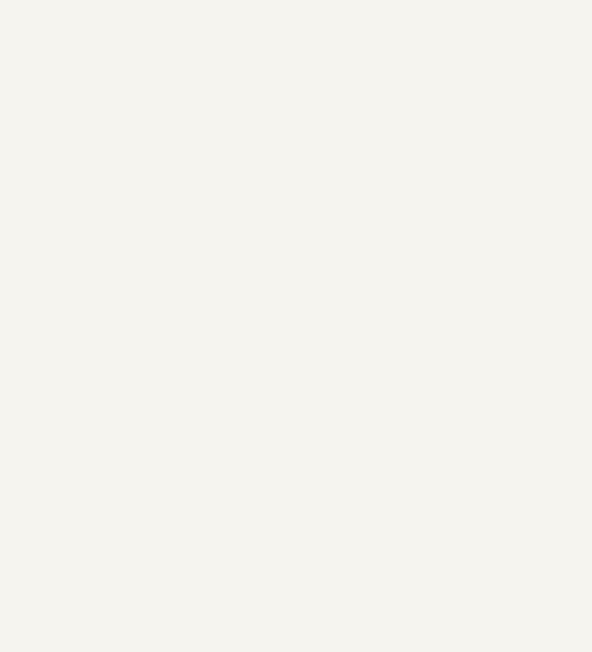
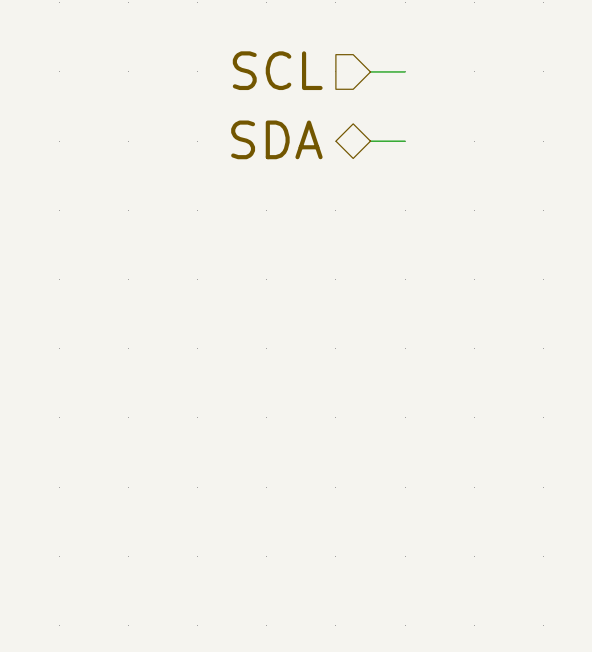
hierarchical label: none -> SCL (277, 70)
wire: none -> (370, 71) (405, 71)
hierarchical label: none -> SDA (276, 139)
wire: none -> (370, 141) (405, 141)

